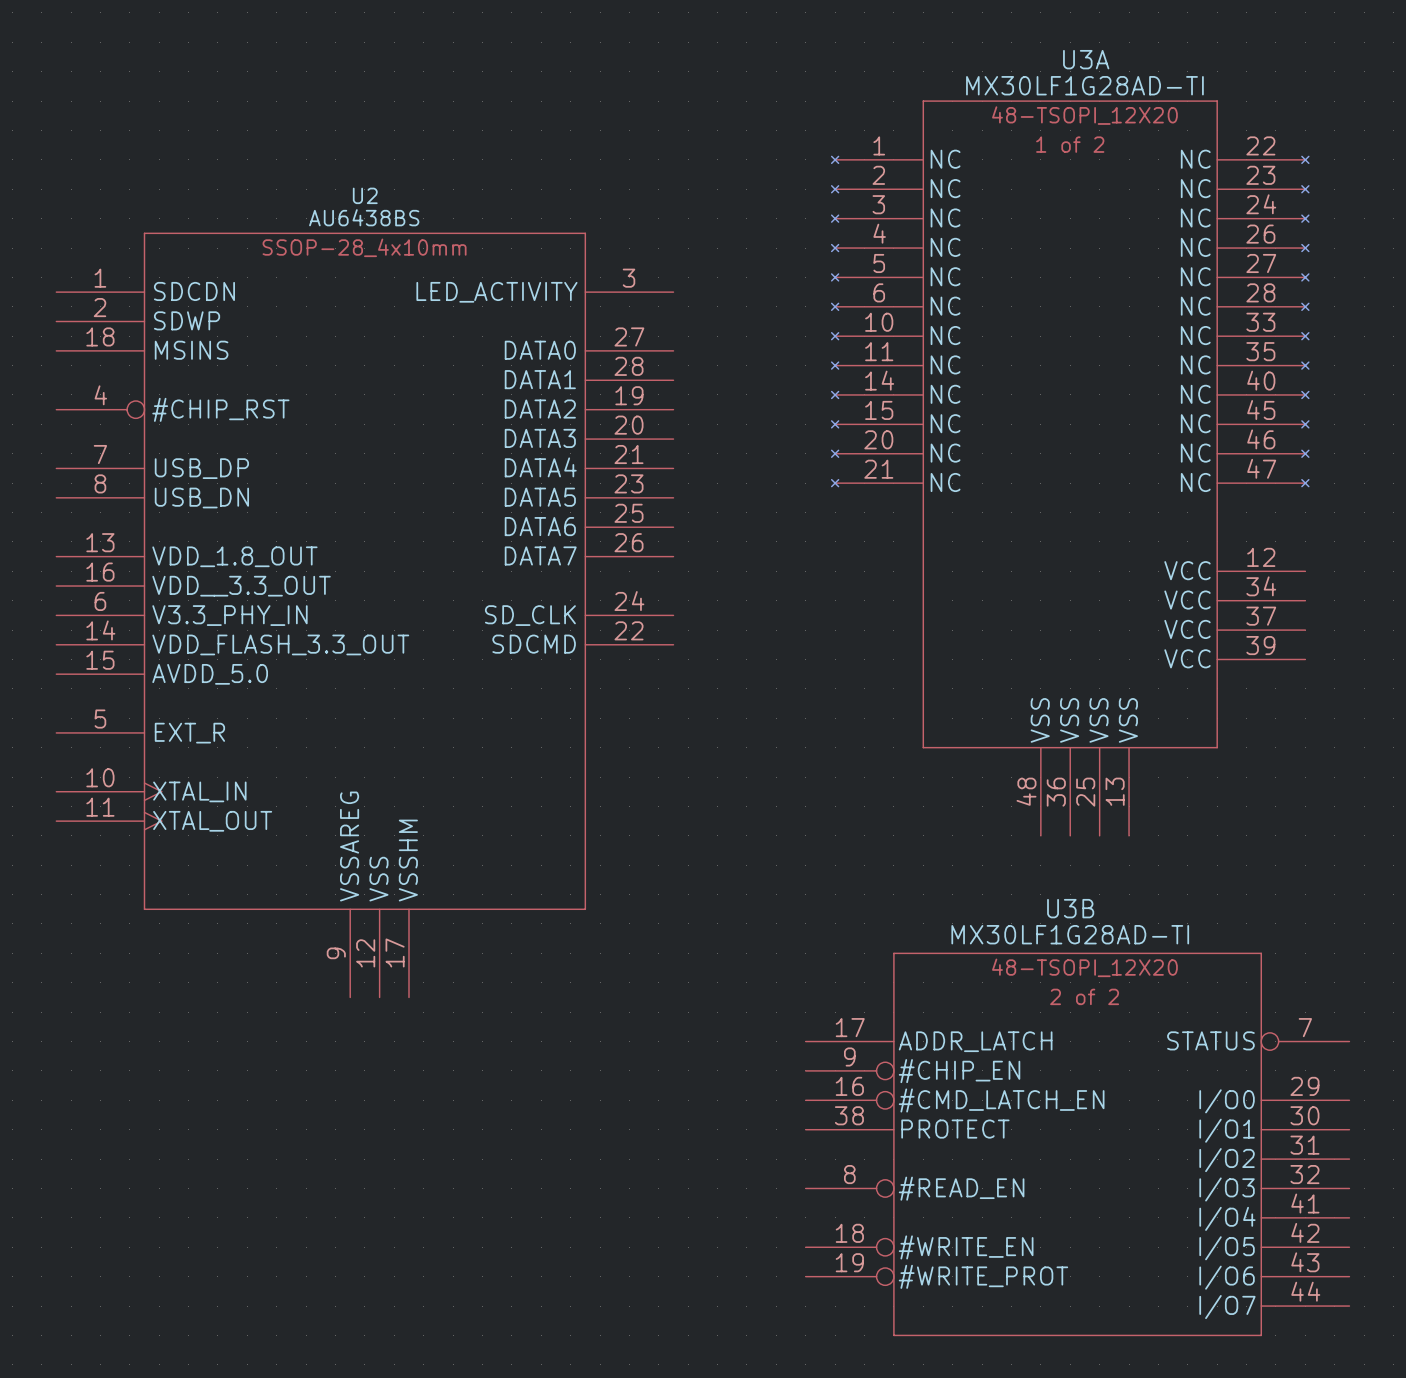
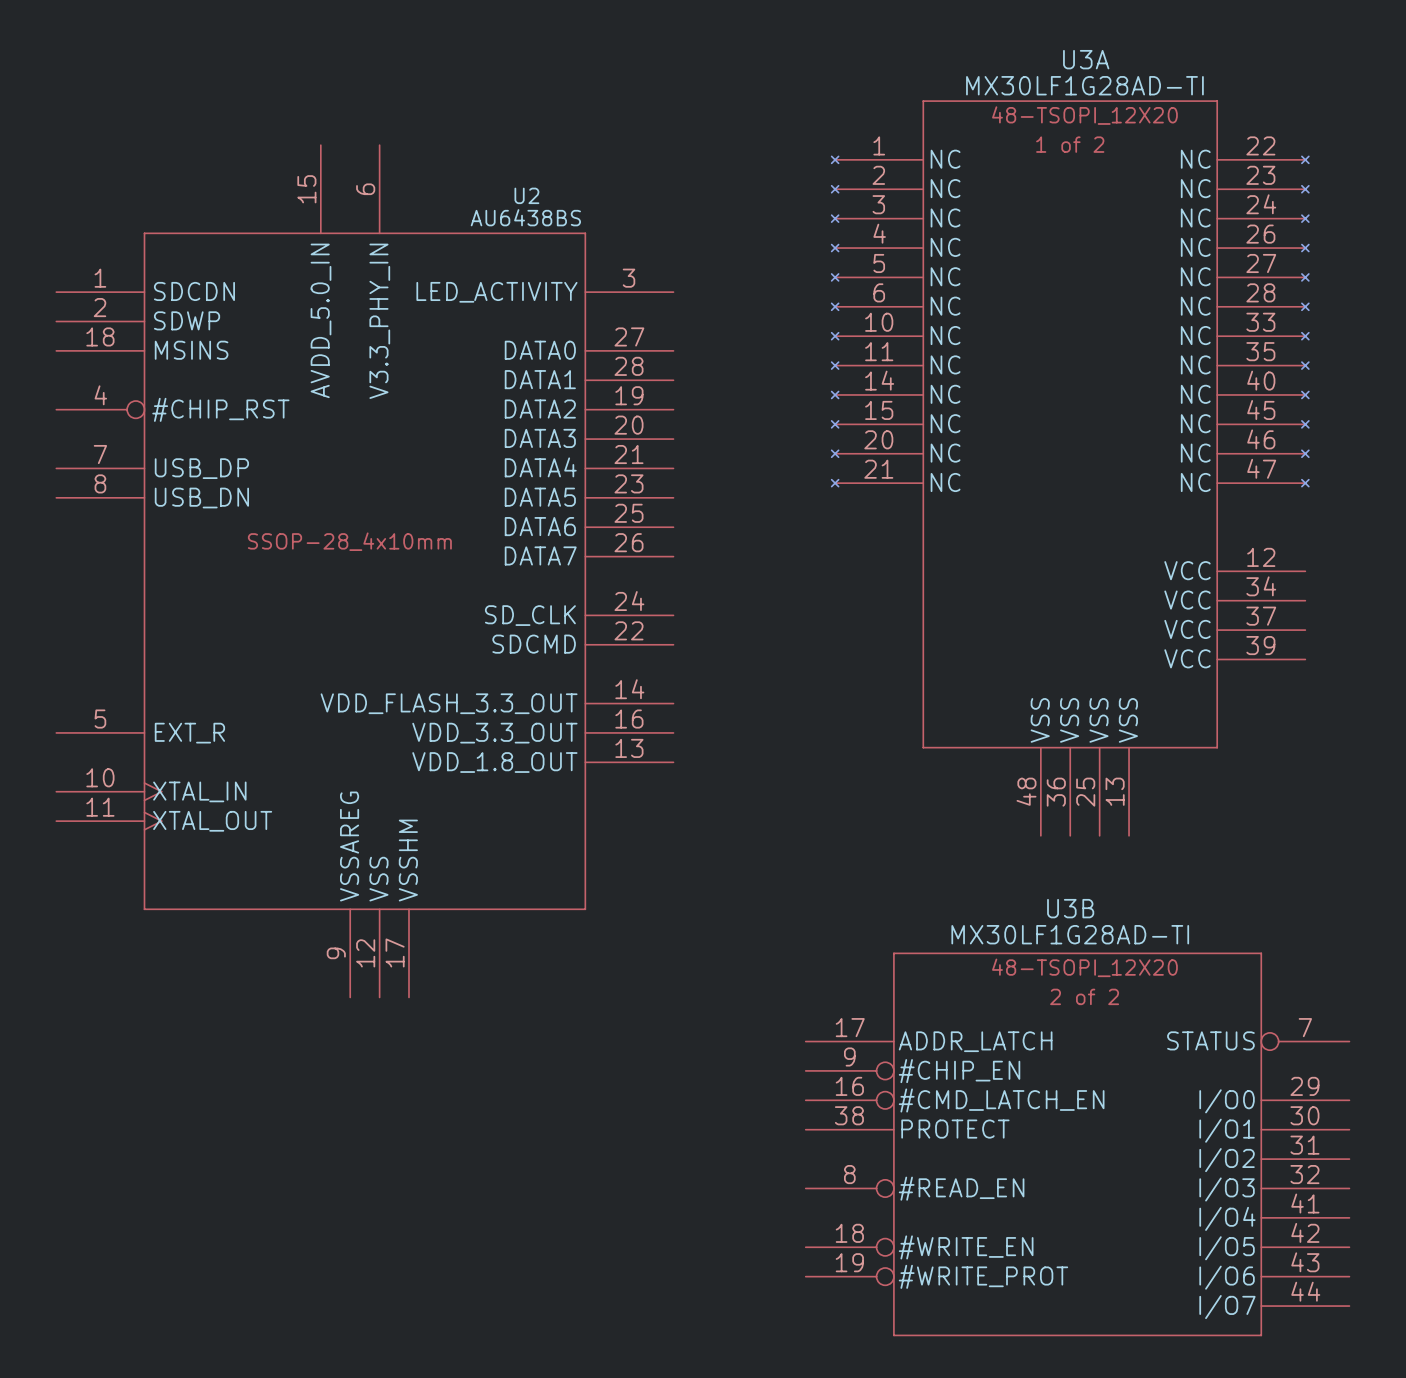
U2 name position: U2 (365, 195) -> U2 (526, 195)
U2 value position: AU6438BS (364, 217) -> AU6438BS (525, 217)
U2 symbol: [56, 232, 674, 998] -> [56, 145, 674, 998]

